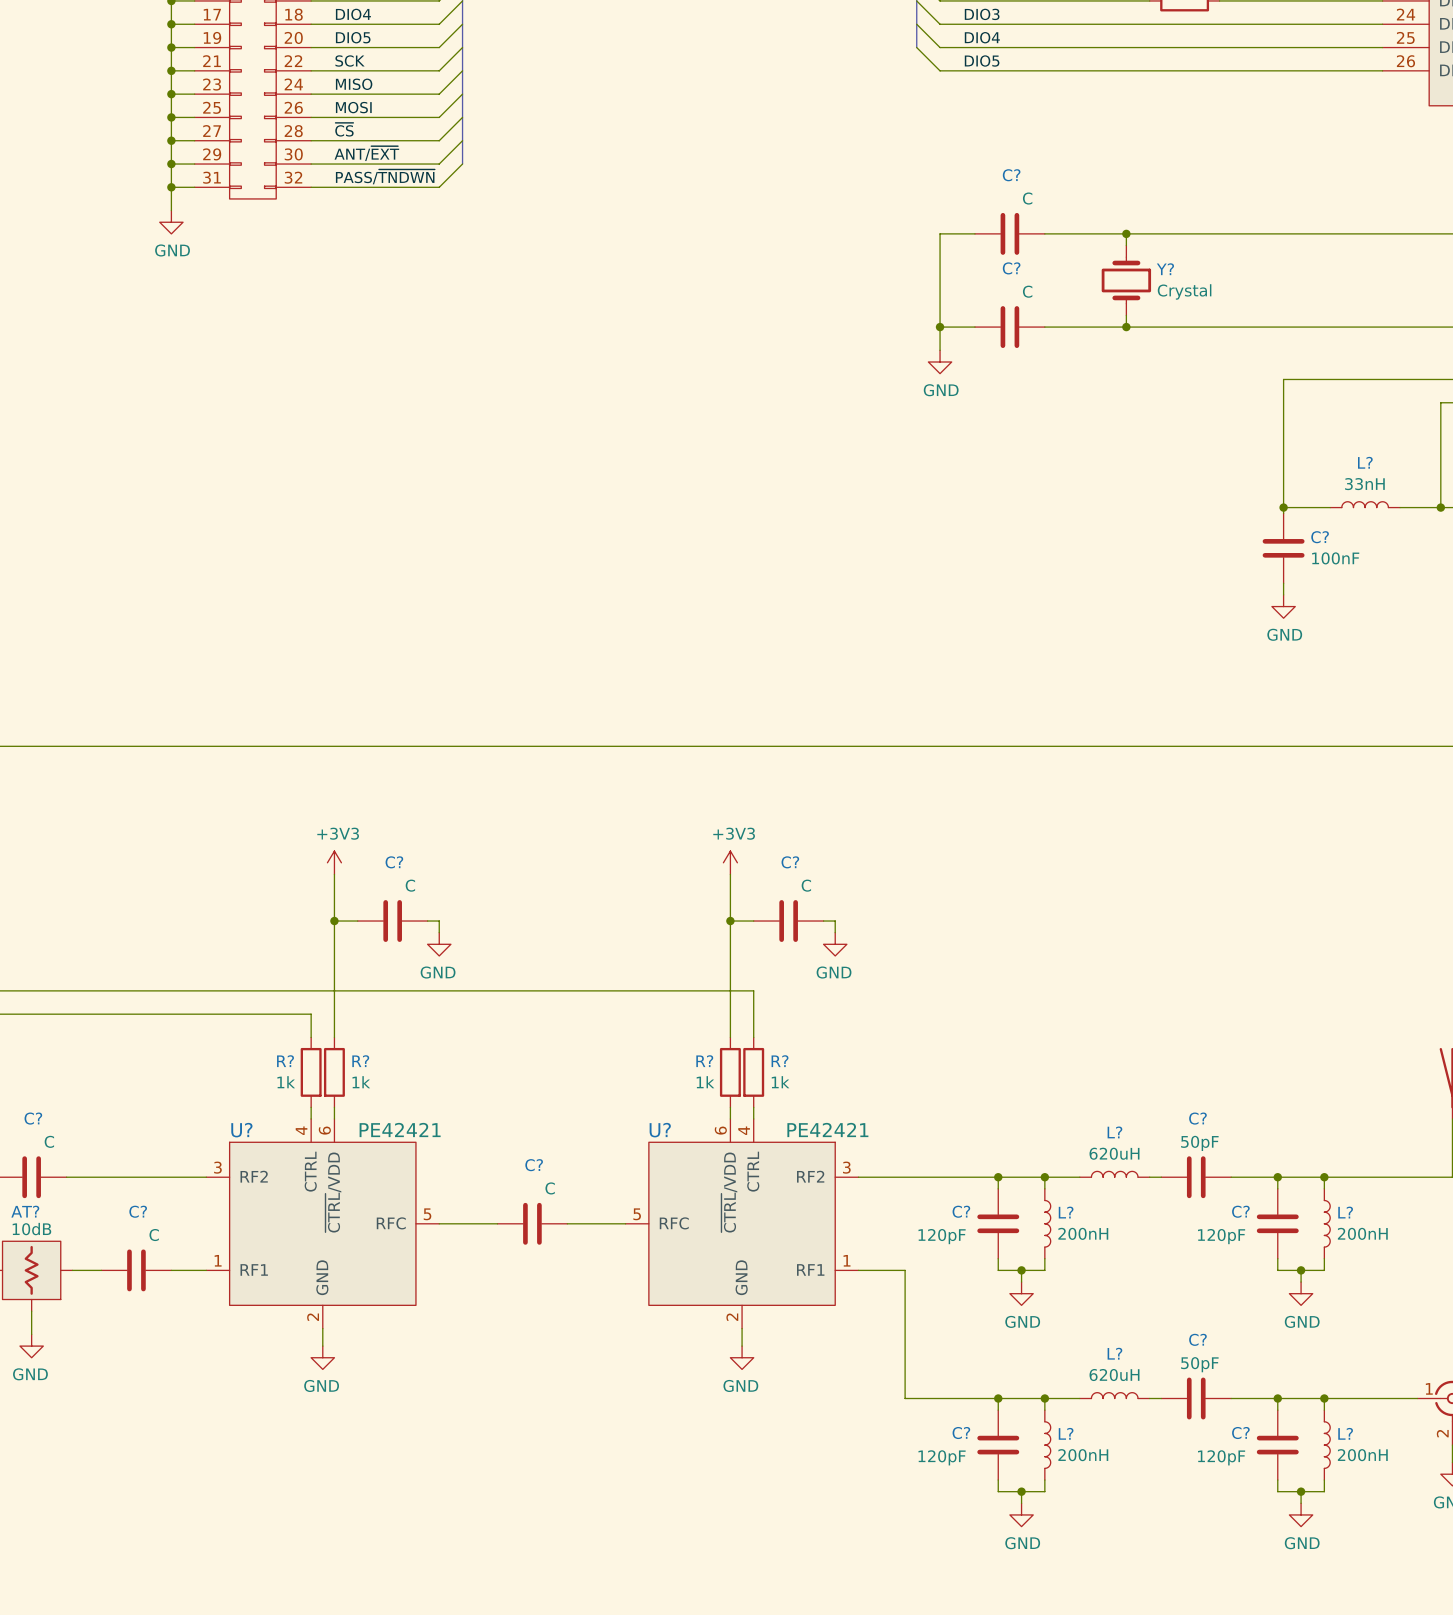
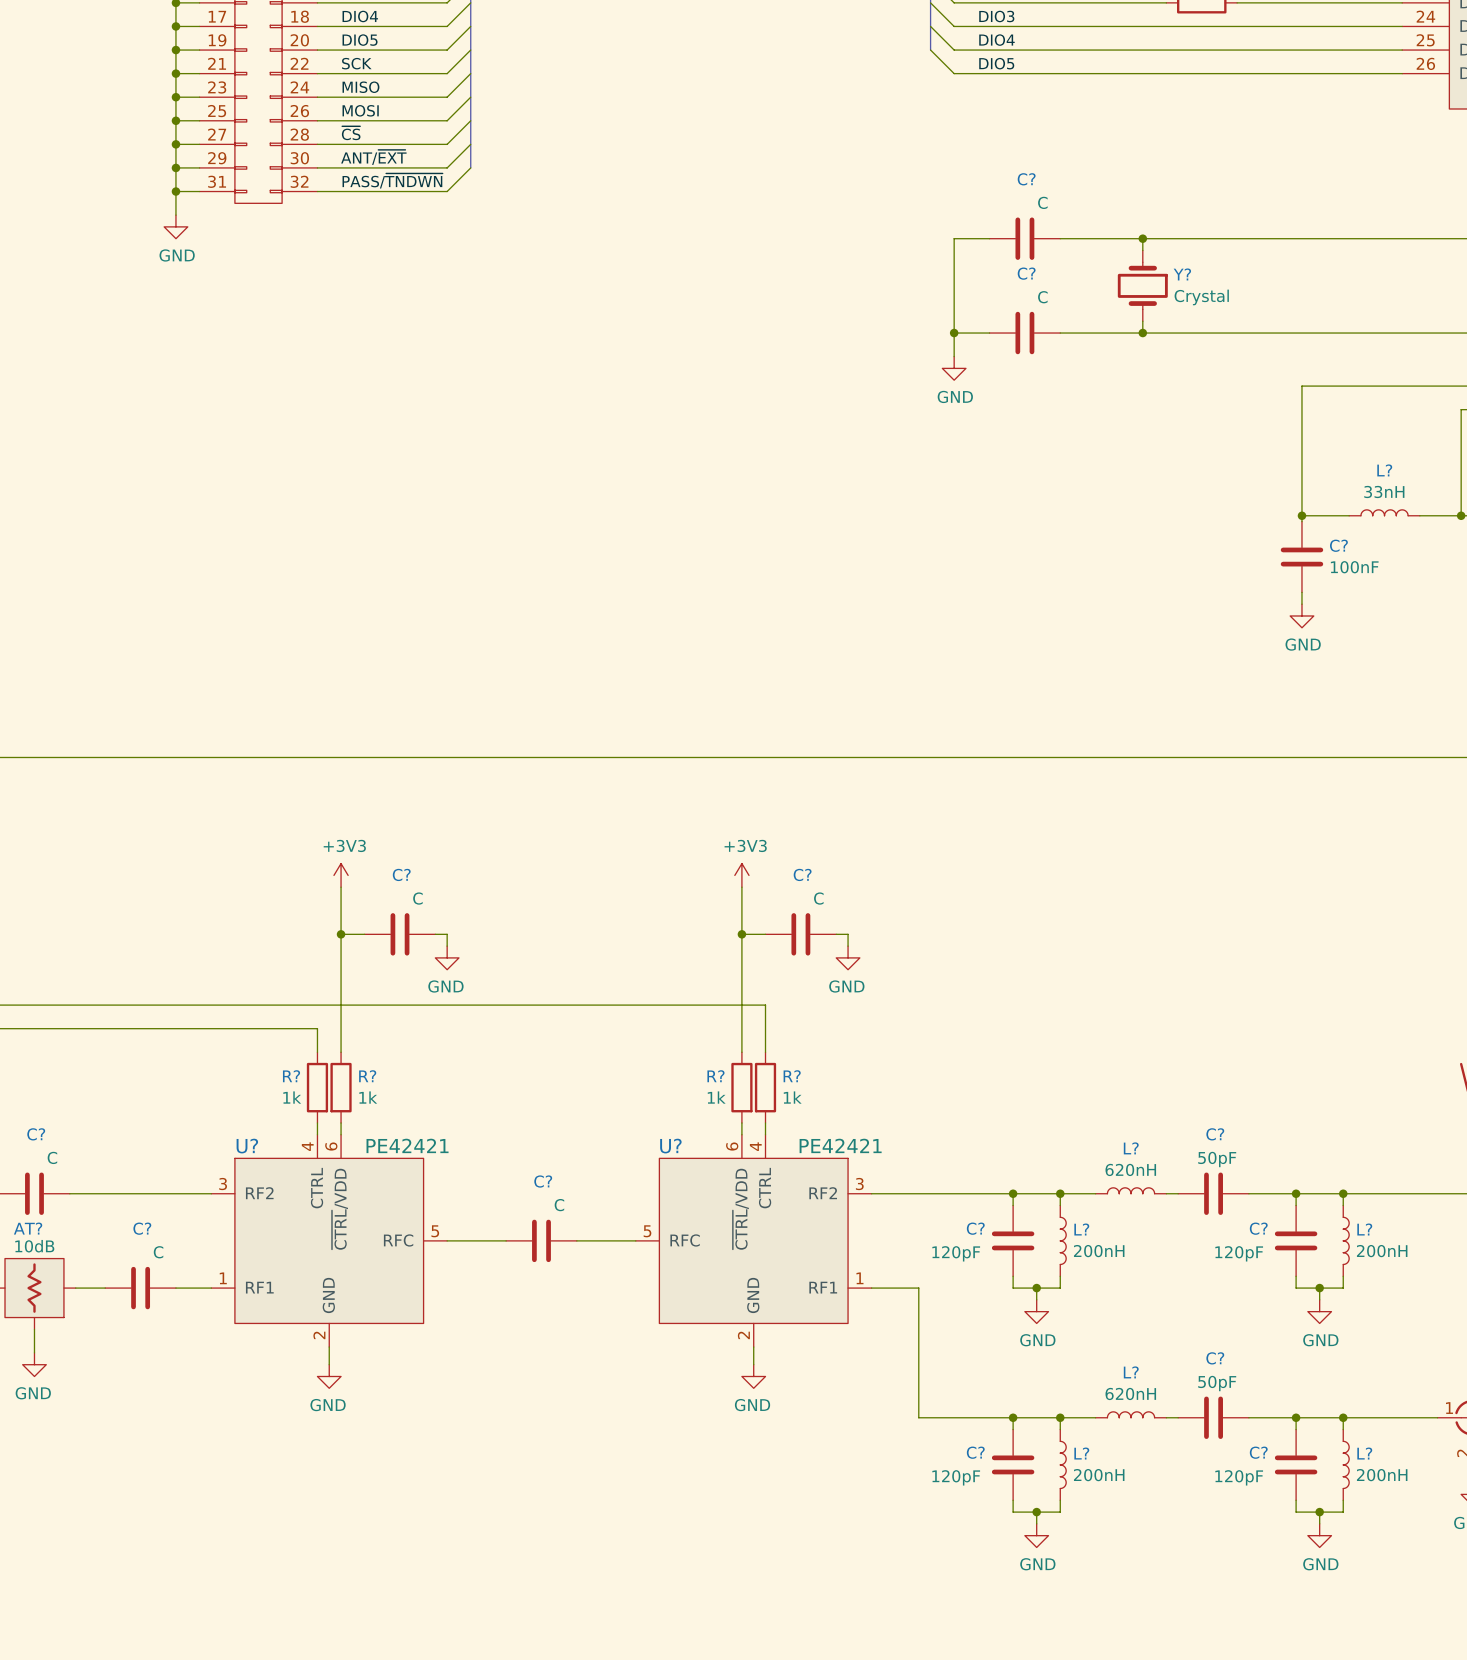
L? value: 620uH (1114, 1153) -> 620nH (1130, 1169)
L? value: 620uH (1114, 1375) -> 620nH (1130, 1393)

